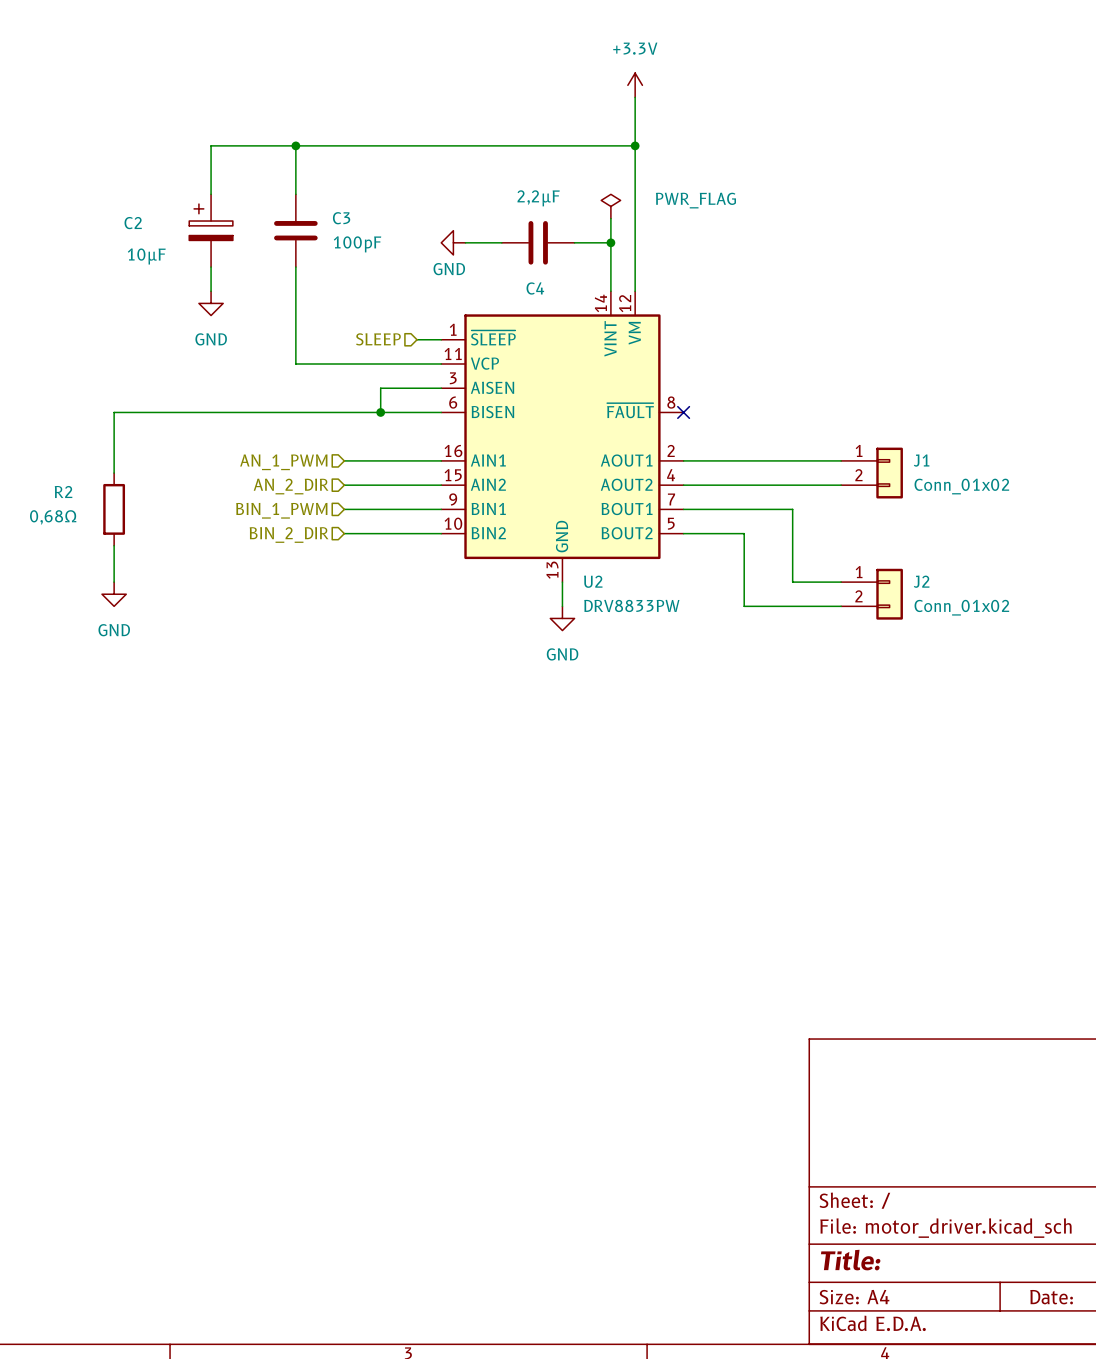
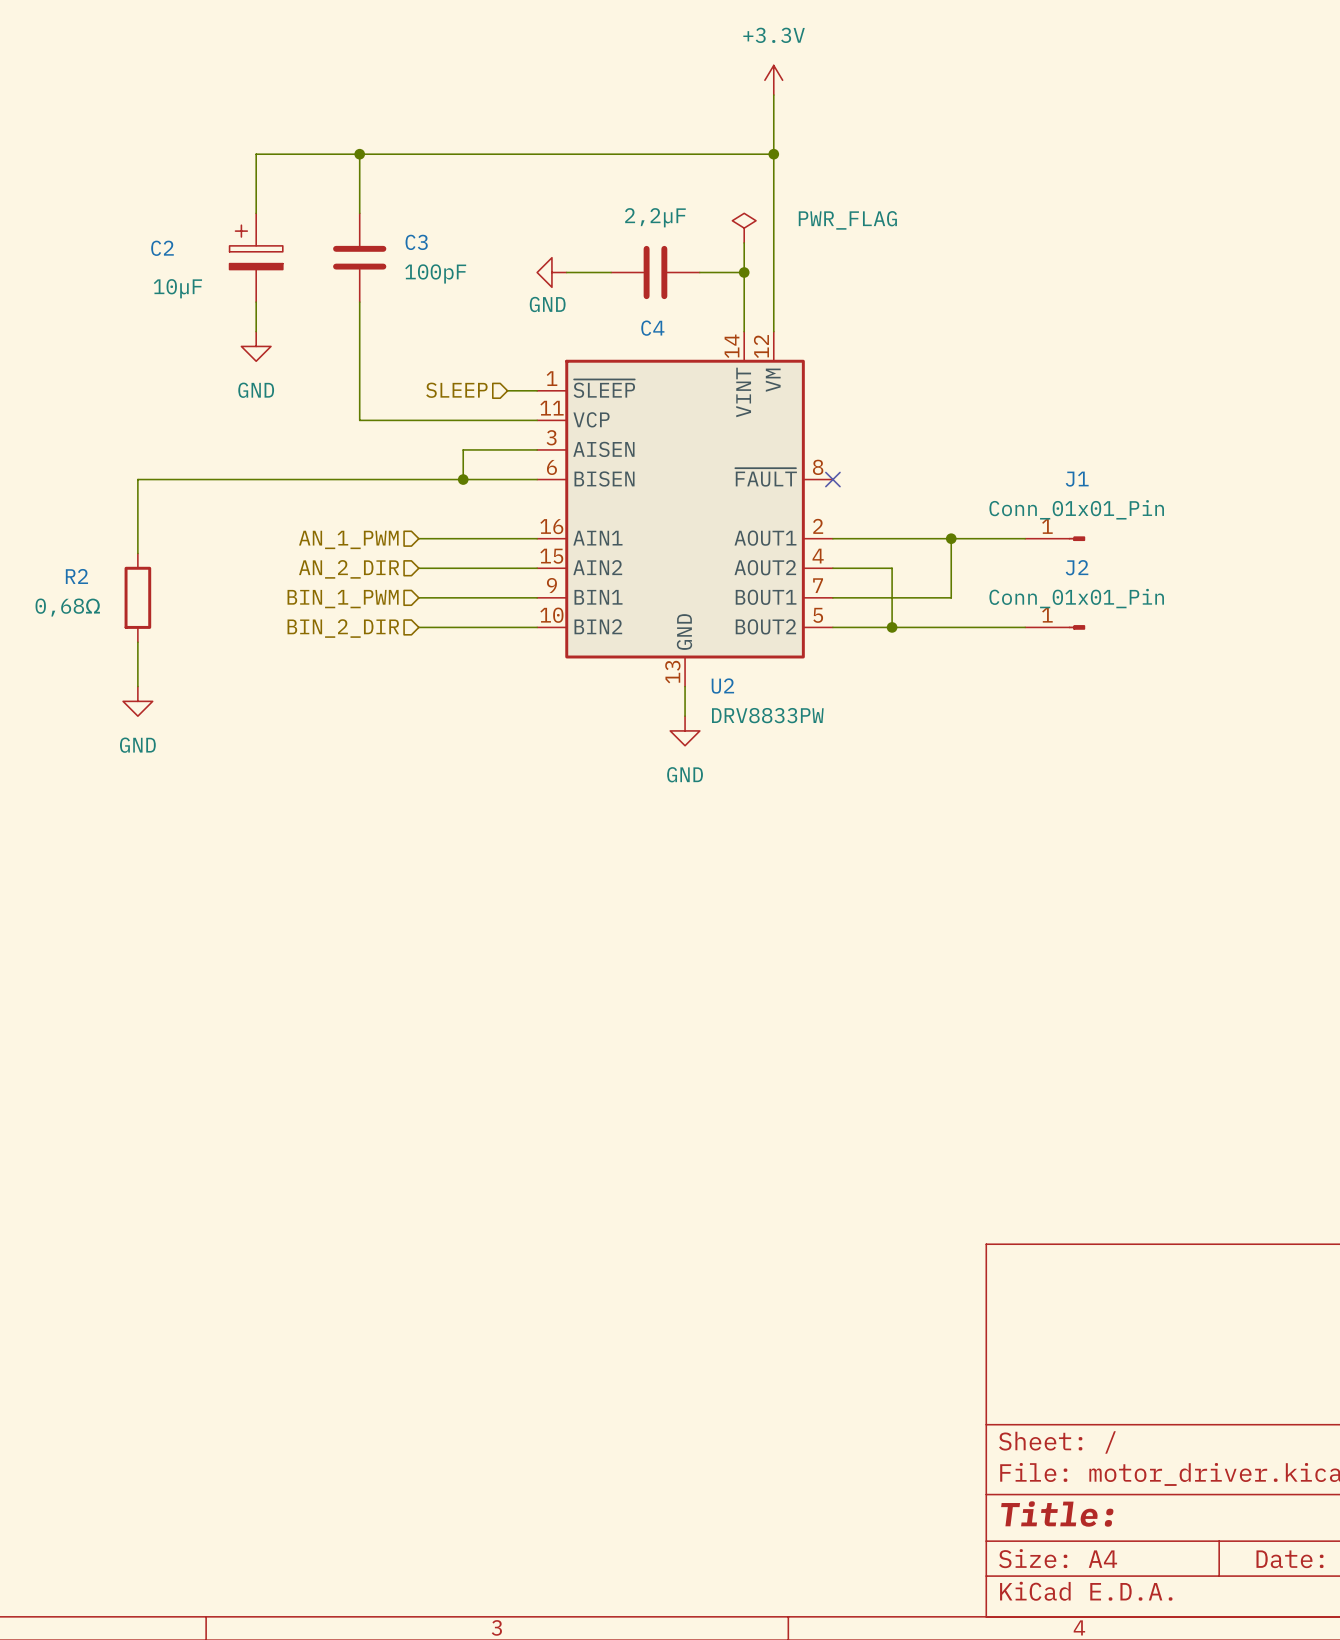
J1 symbol: [841, 447, 903, 499] -> [1025, 536, 1086, 542]
junction: none -> (951, 538)
J1 name position: J1 (921, 460) -> J1 (1077, 479)
wire: (732, 485) (841, 485) -> (892, 568) (892, 627)
J1 value: Conn_01x02 (961, 486) -> Conn_01x01_Pin (1076, 509)
wire: (780, 509) (792, 509) (792, 582) (841, 582) -> (951, 597) (951, 538)
junction: none -> (892, 627)
wire: (744, 533) (744, 606) (841, 606) -> (906, 627) (1025, 627)
J2 symbol: [841, 568, 903, 620] -> [1025, 625, 1086, 630]
J2 name position: J2 (921, 581) -> J2 (1077, 567)
J2 value: Conn_01x02 (961, 607) -> Conn_01x01_Pin (1076, 598)

